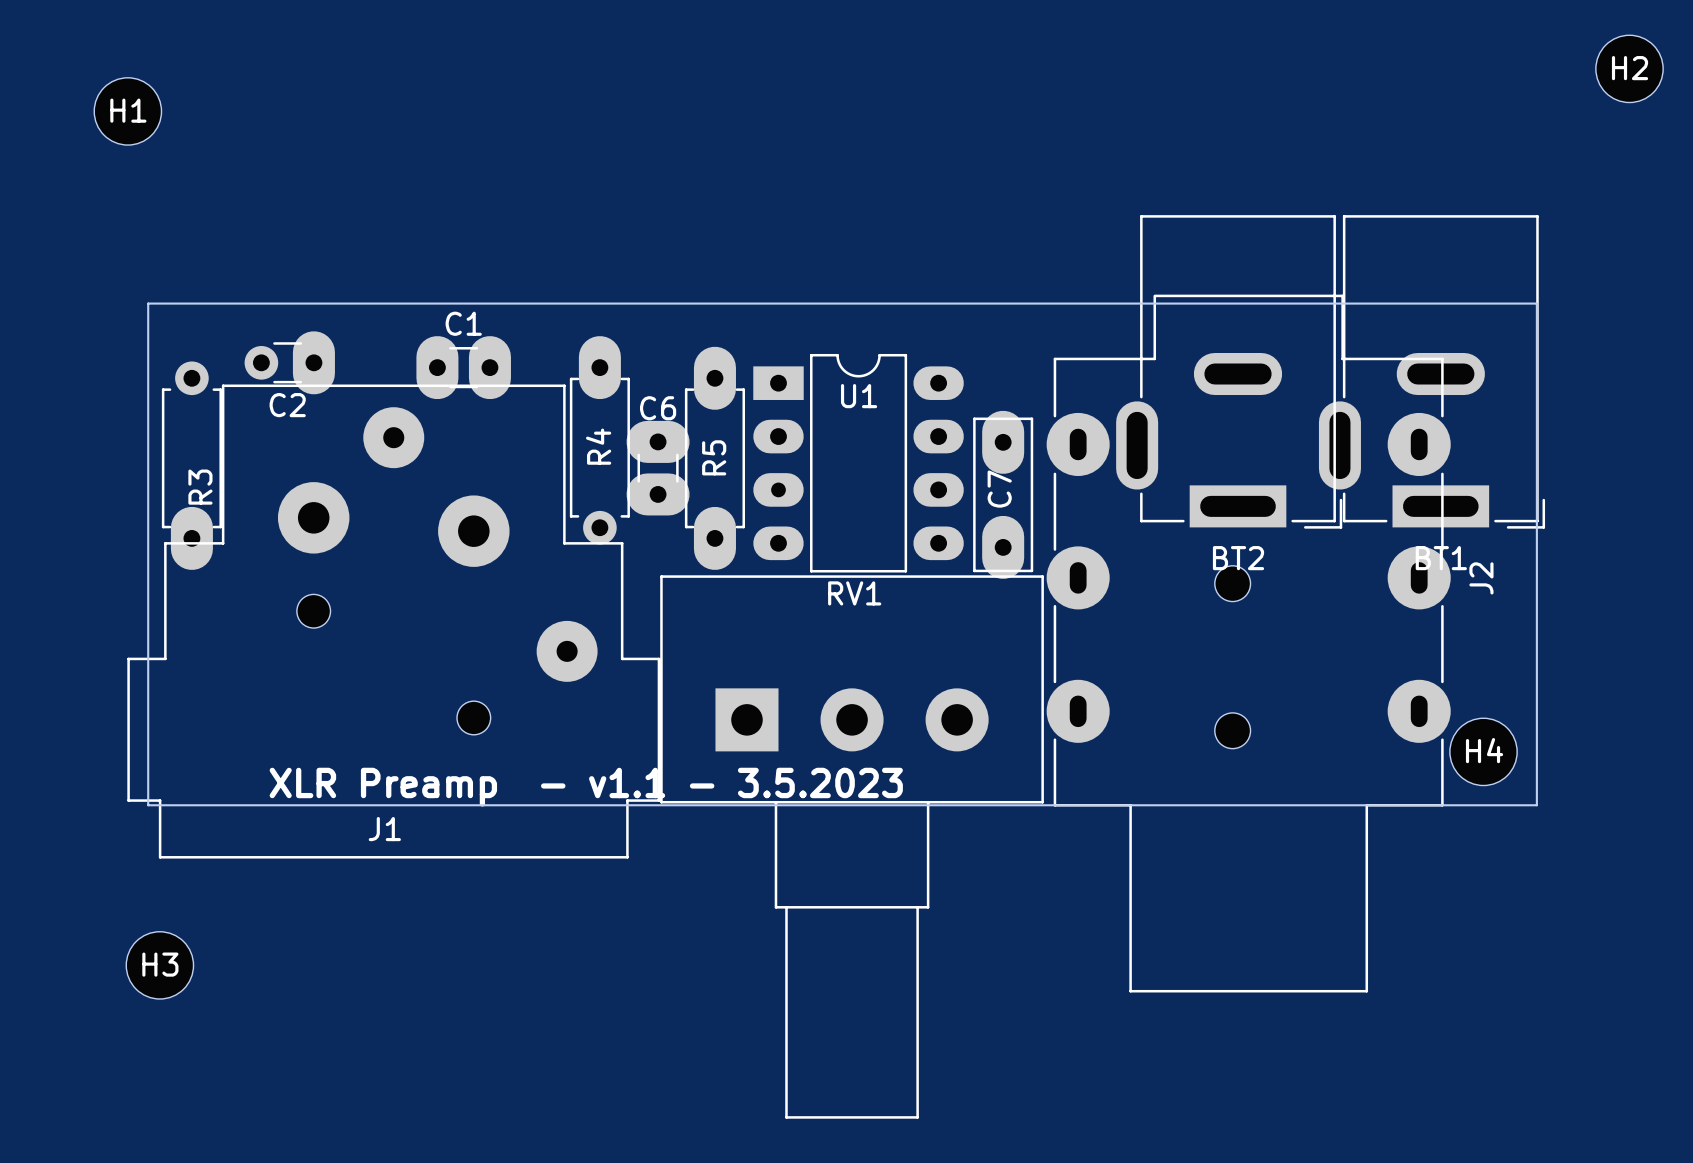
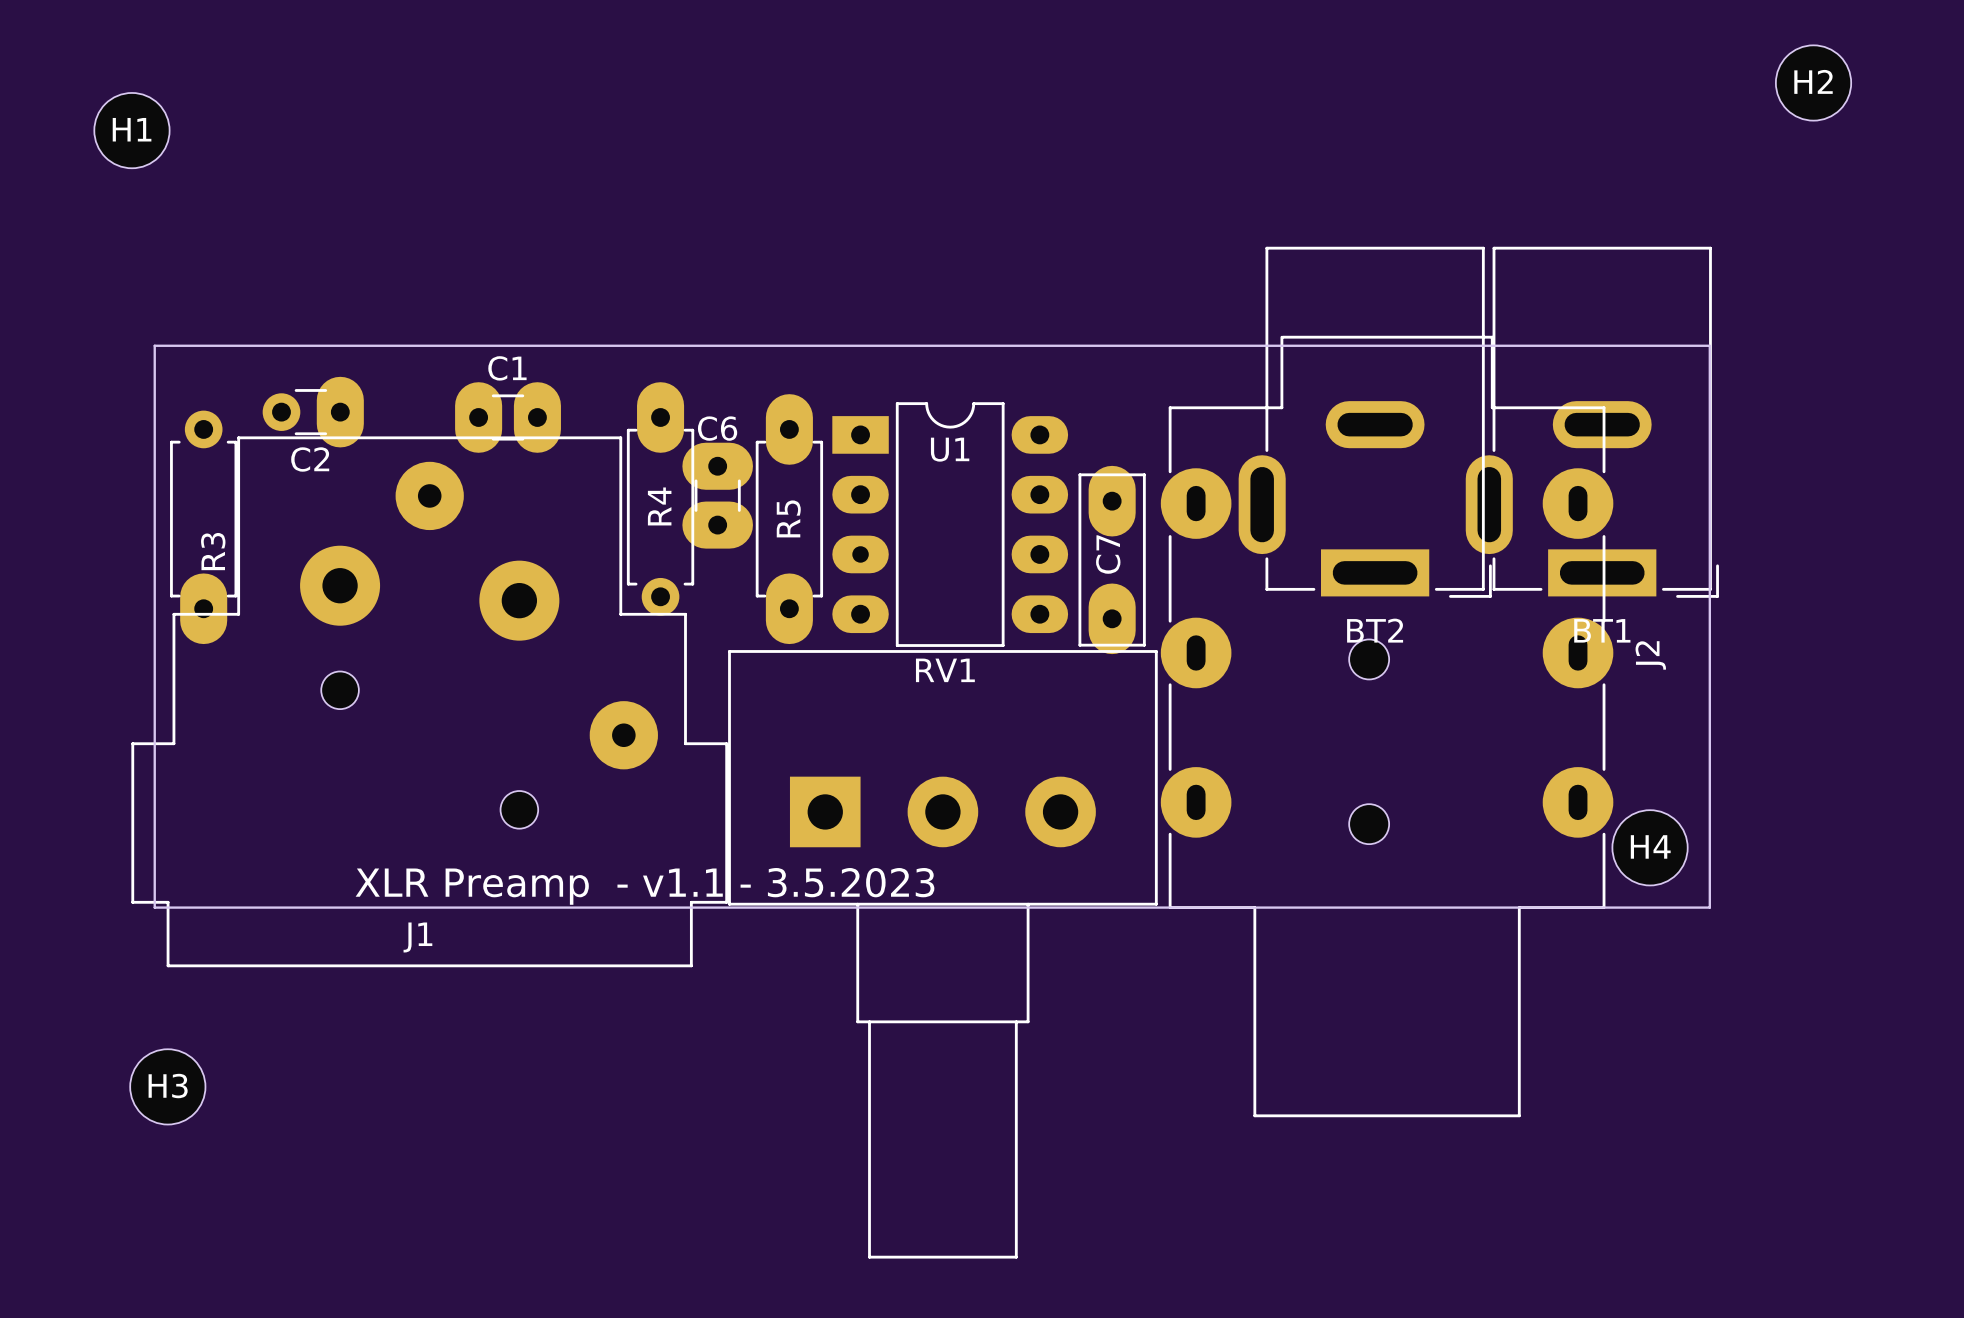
C6 position: (658, 468) -> (717, 495)

